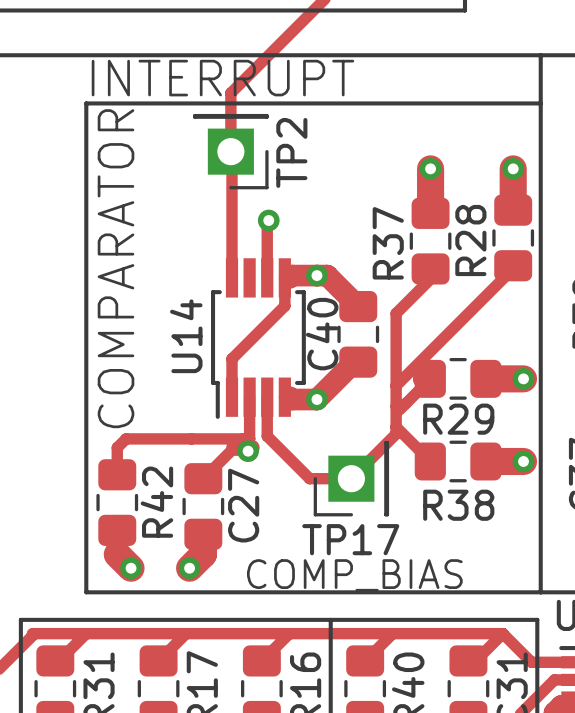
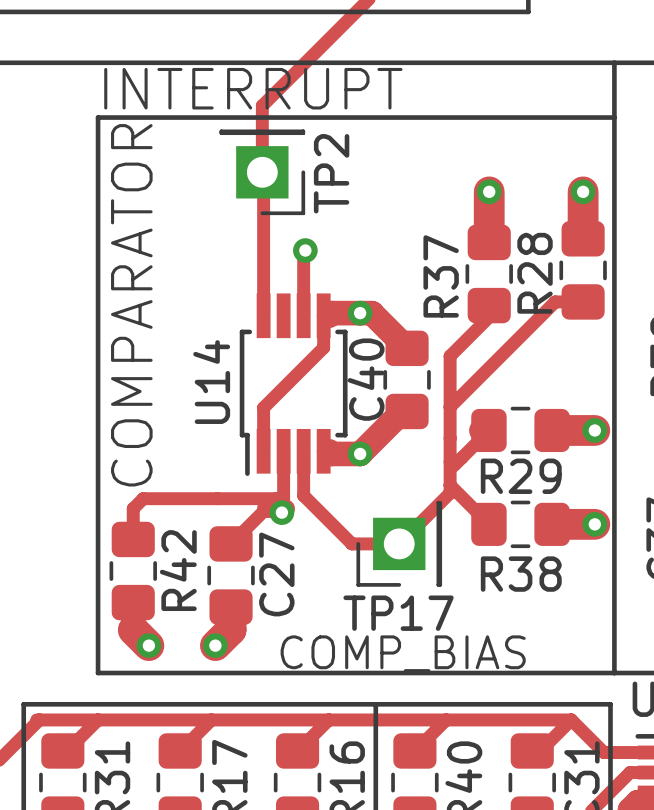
track: none -> (583, 301) (555, 301) (450, 407)
track: (513, 268) (396, 385) -> none

